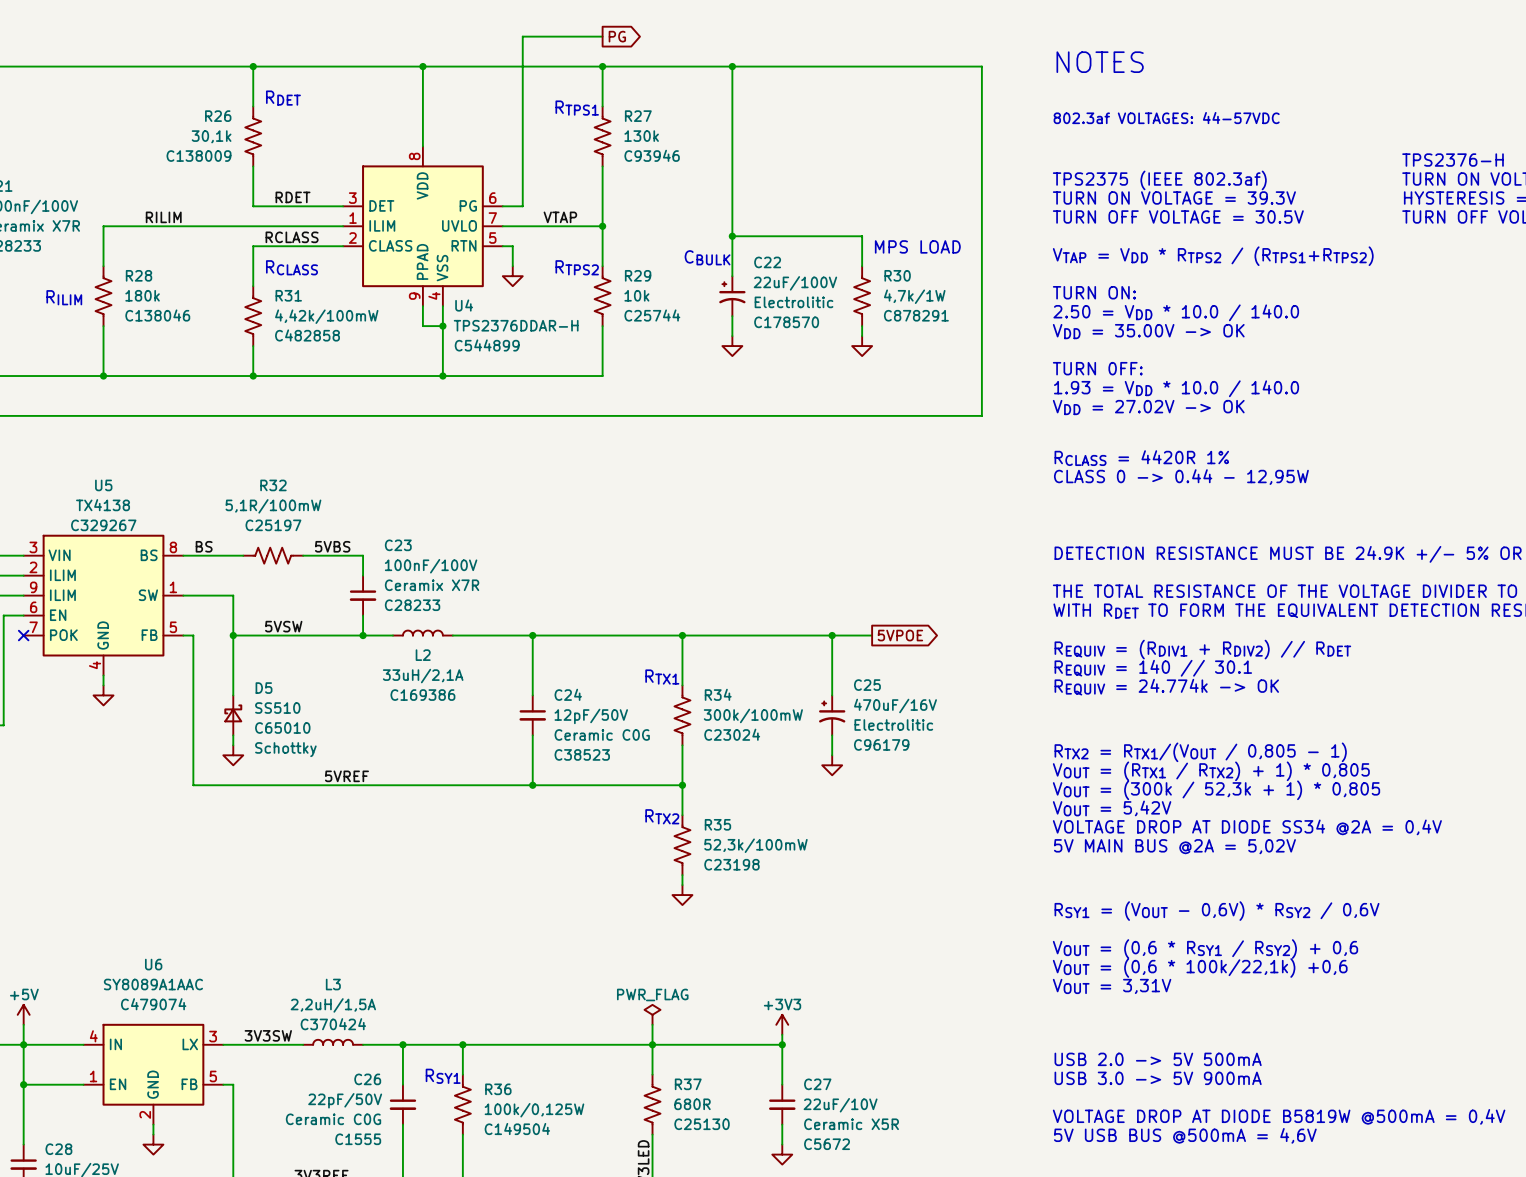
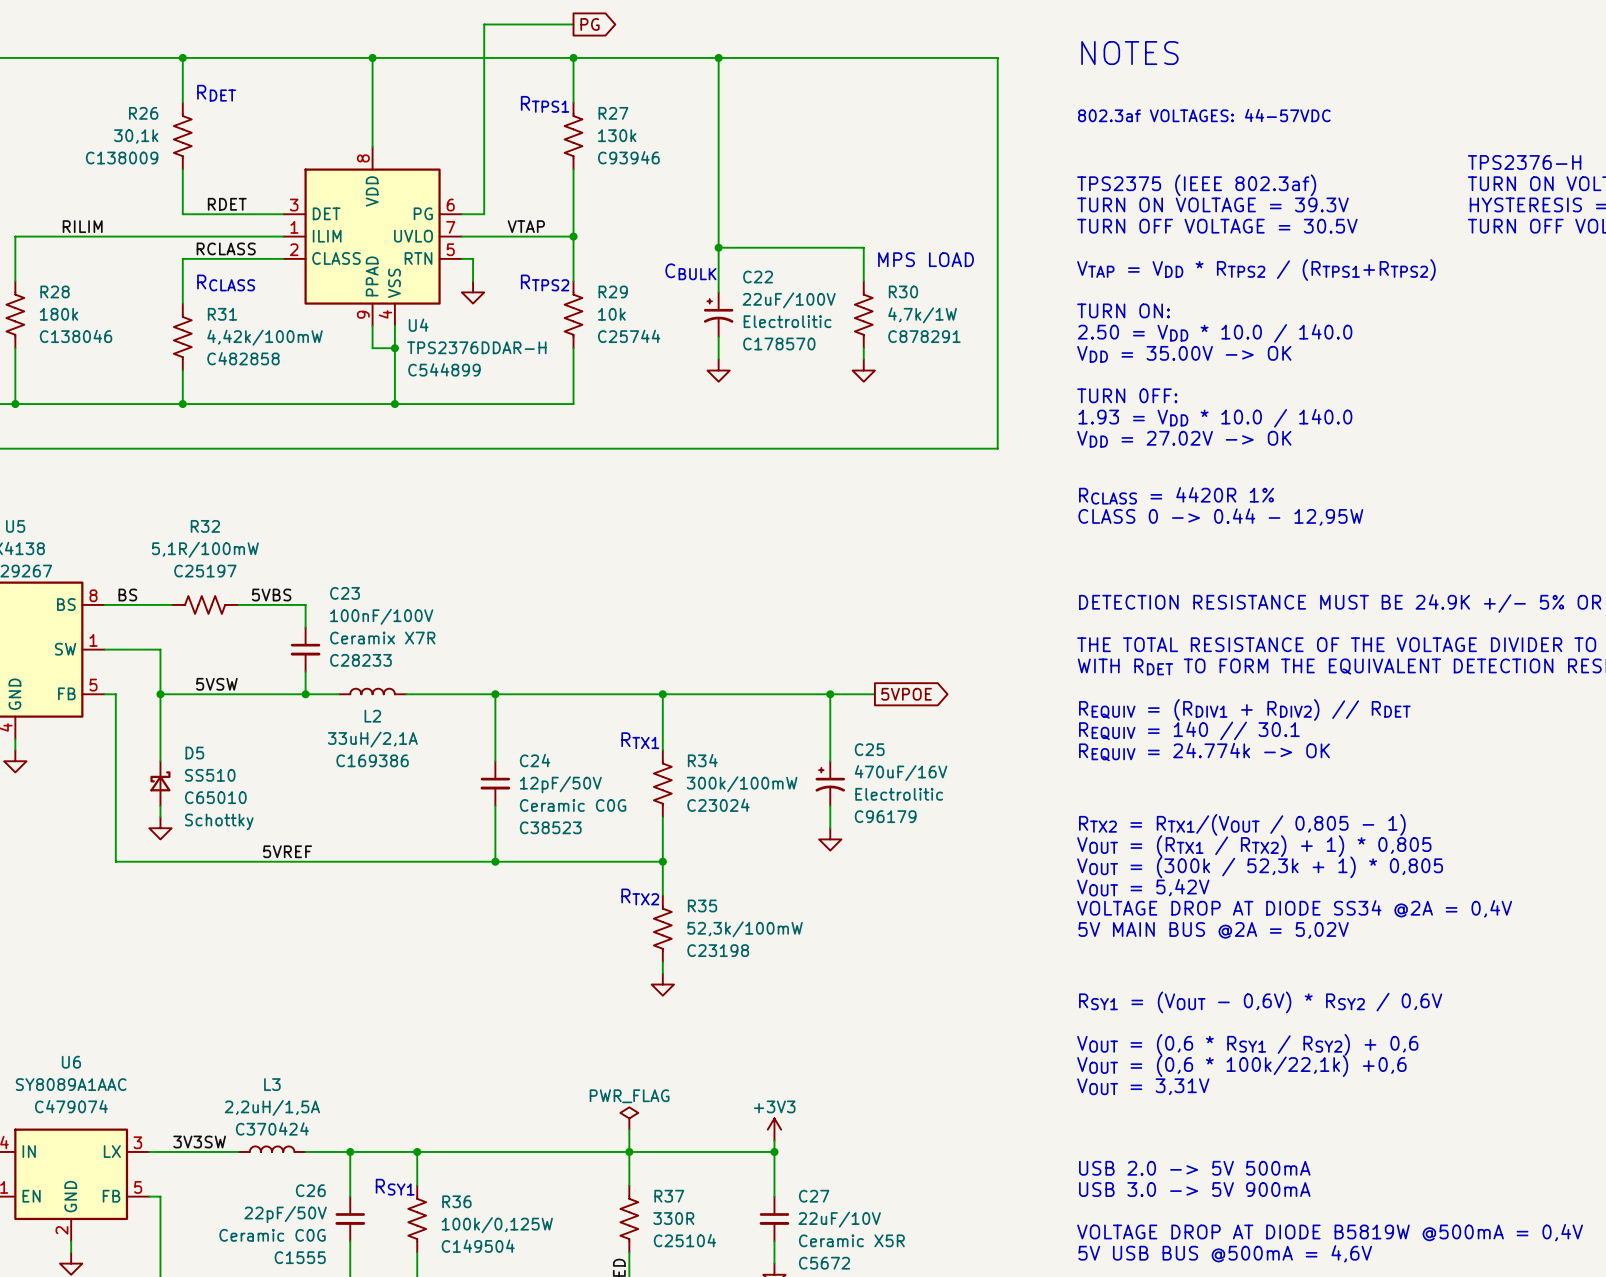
R37 value: 680R (692, 1104) -> 330R (673, 1218)
R37 text: C25130 (702, 1124) -> C25104 (684, 1240)

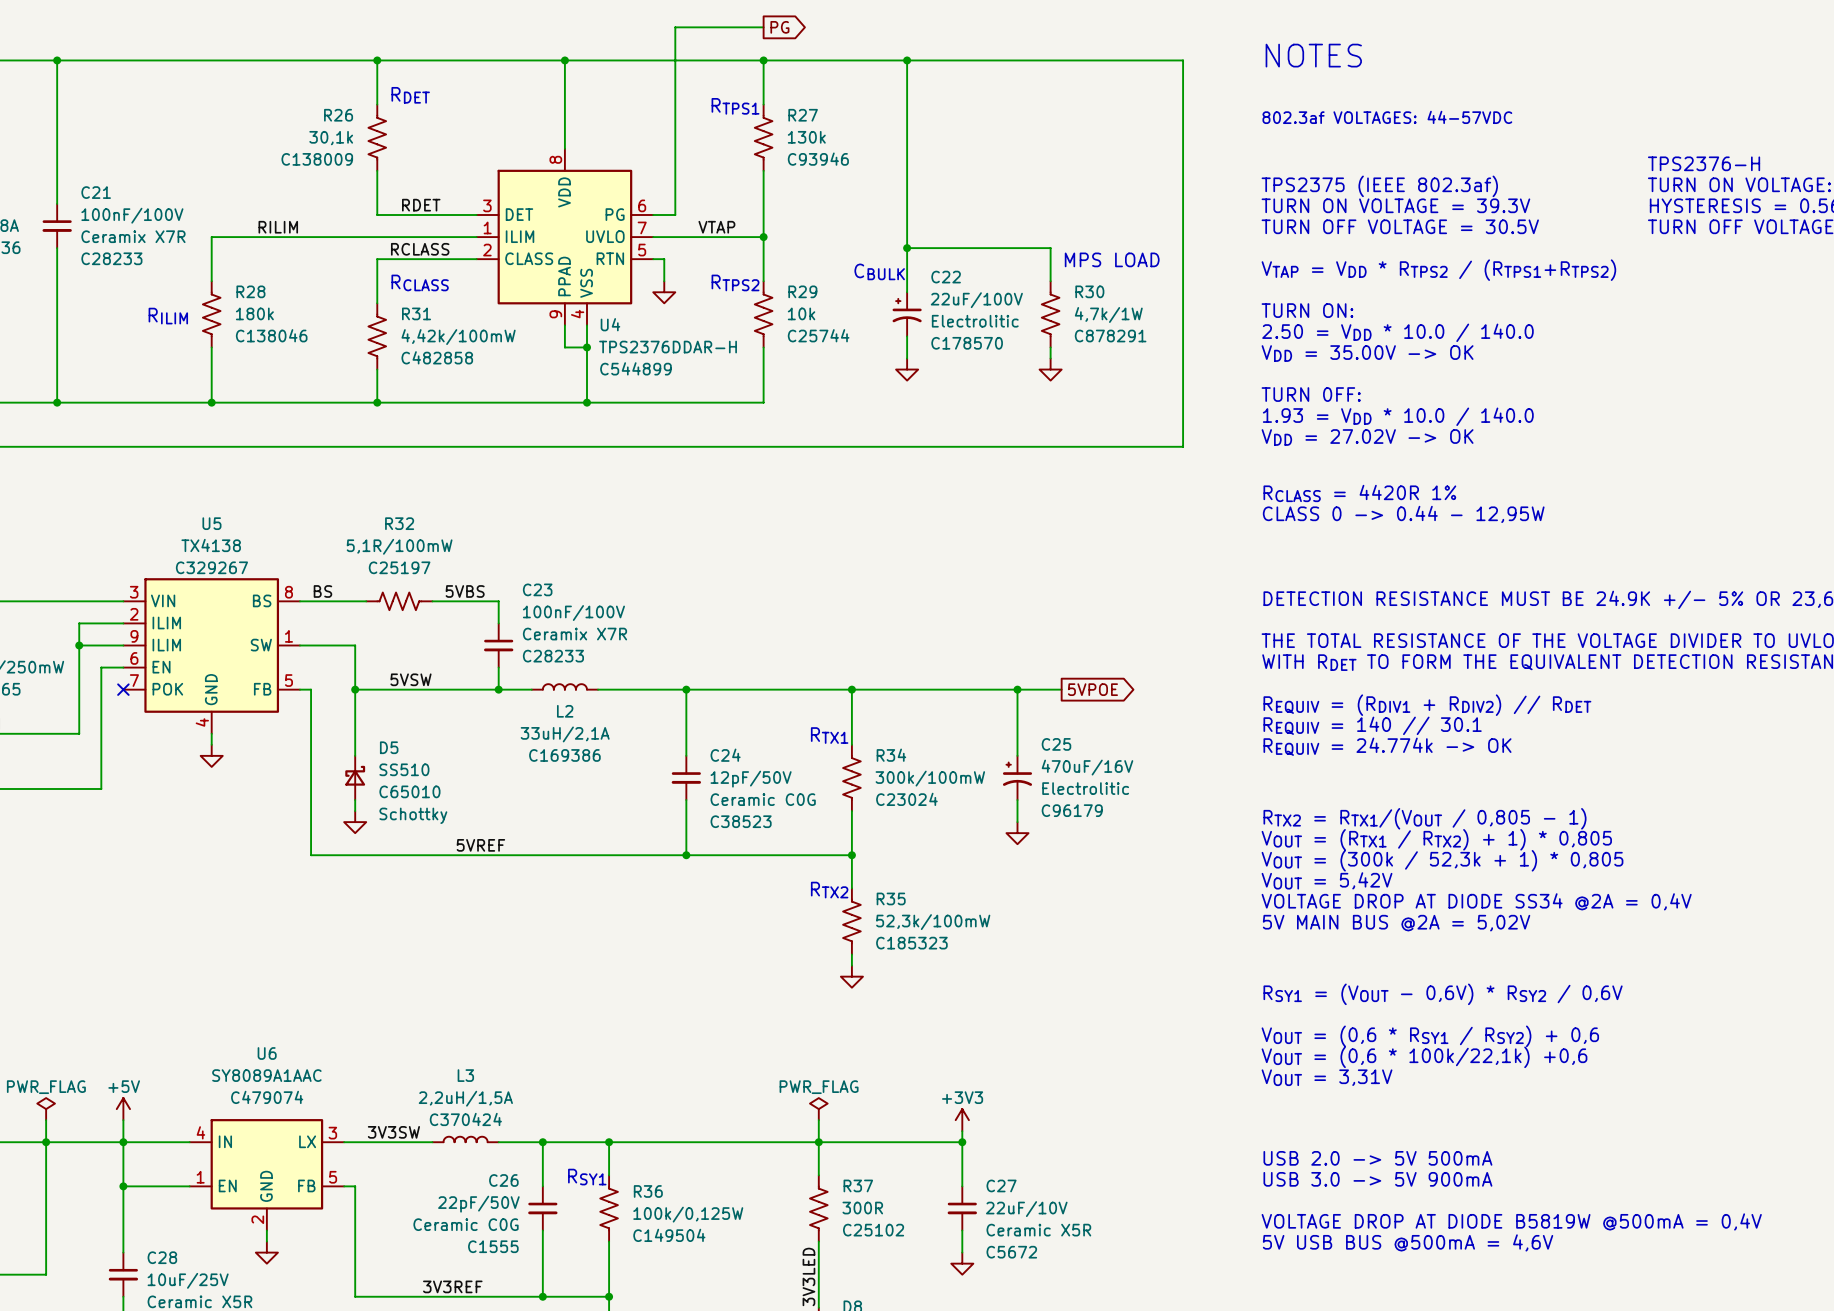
R35 text: C23198 (718, 950) -> C185323 (911, 943)
R37 value: 330R (673, 1218) -> 300R (862, 1208)
R37 text: C25104 (684, 1240) -> C25102 (873, 1230)

